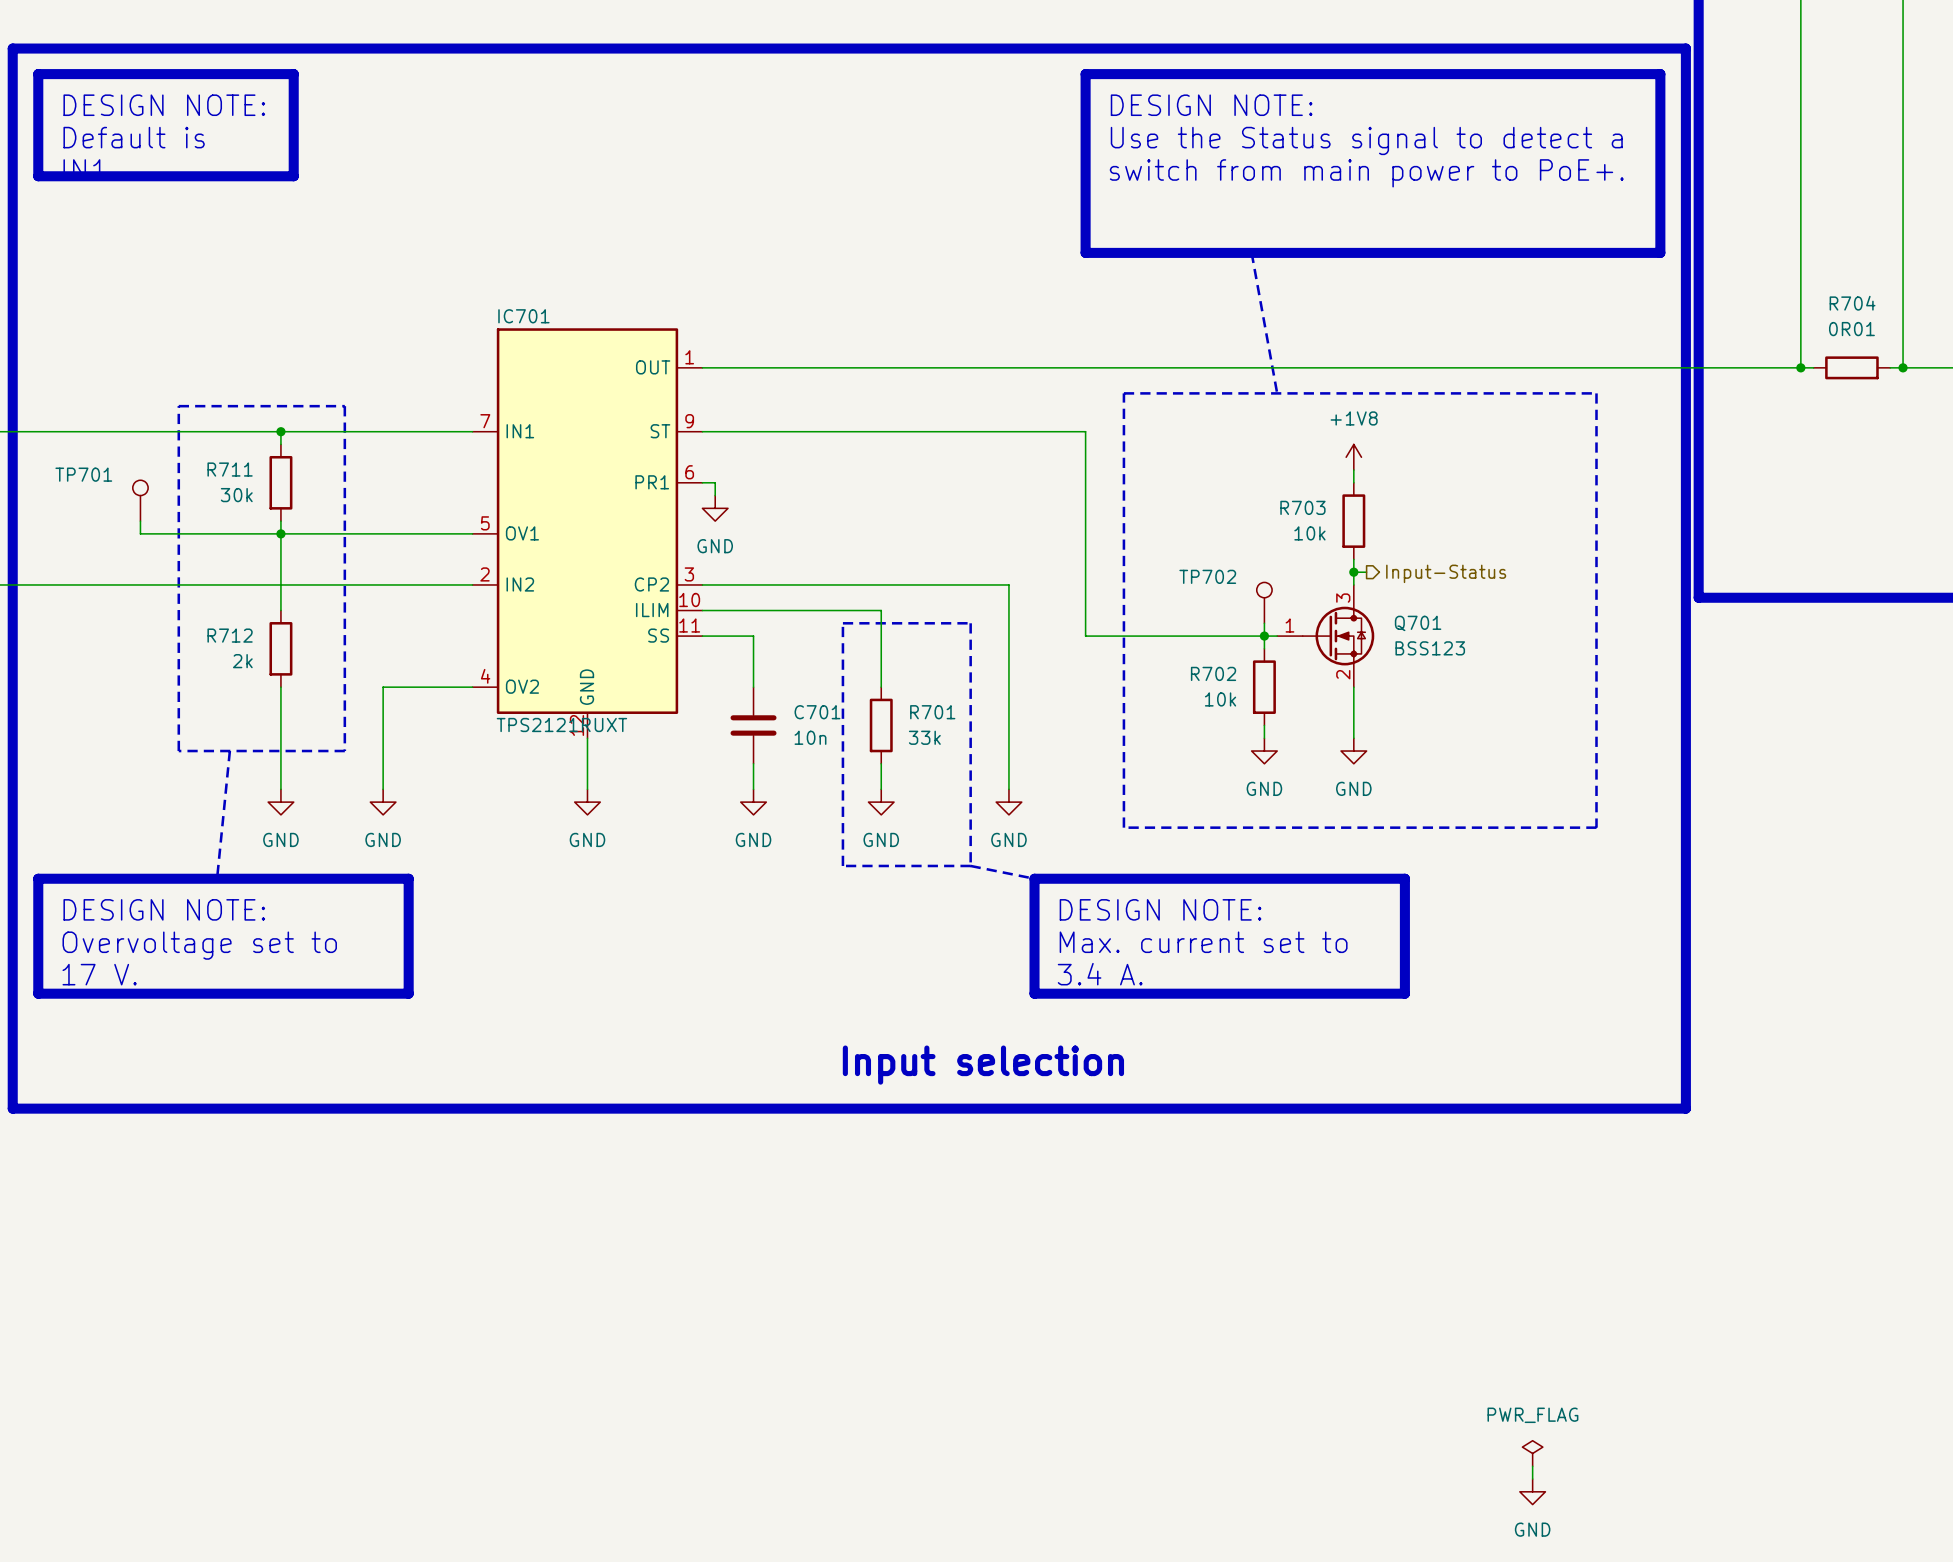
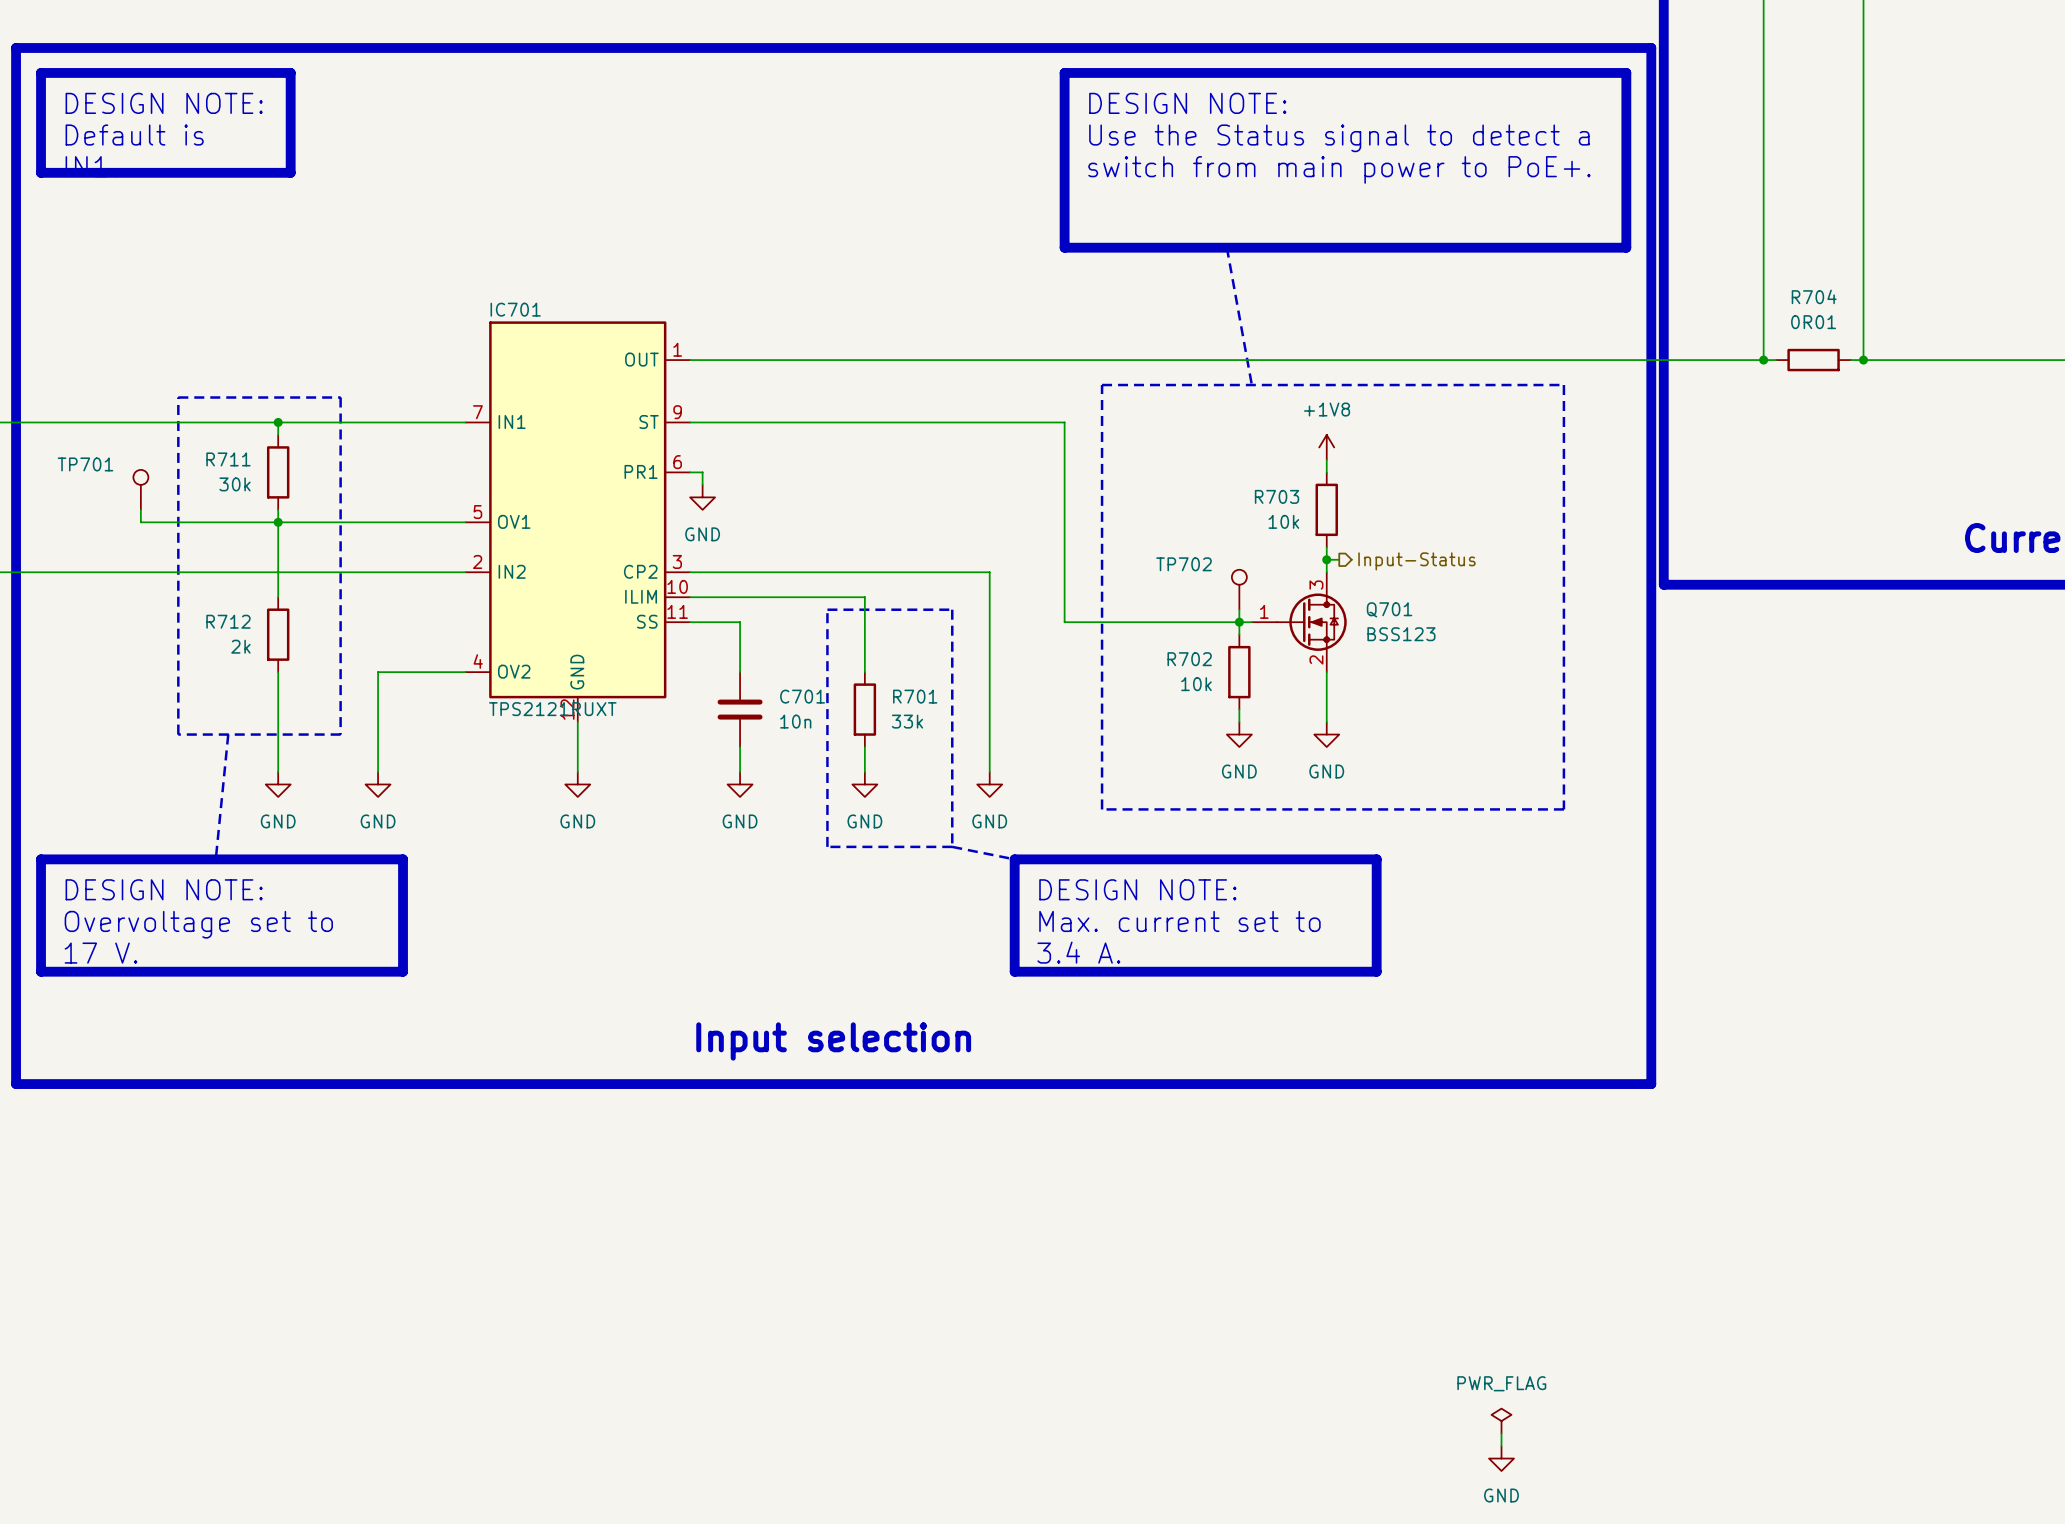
text position: Input selection (983, 1065) -> Input selection (833, 1041)

